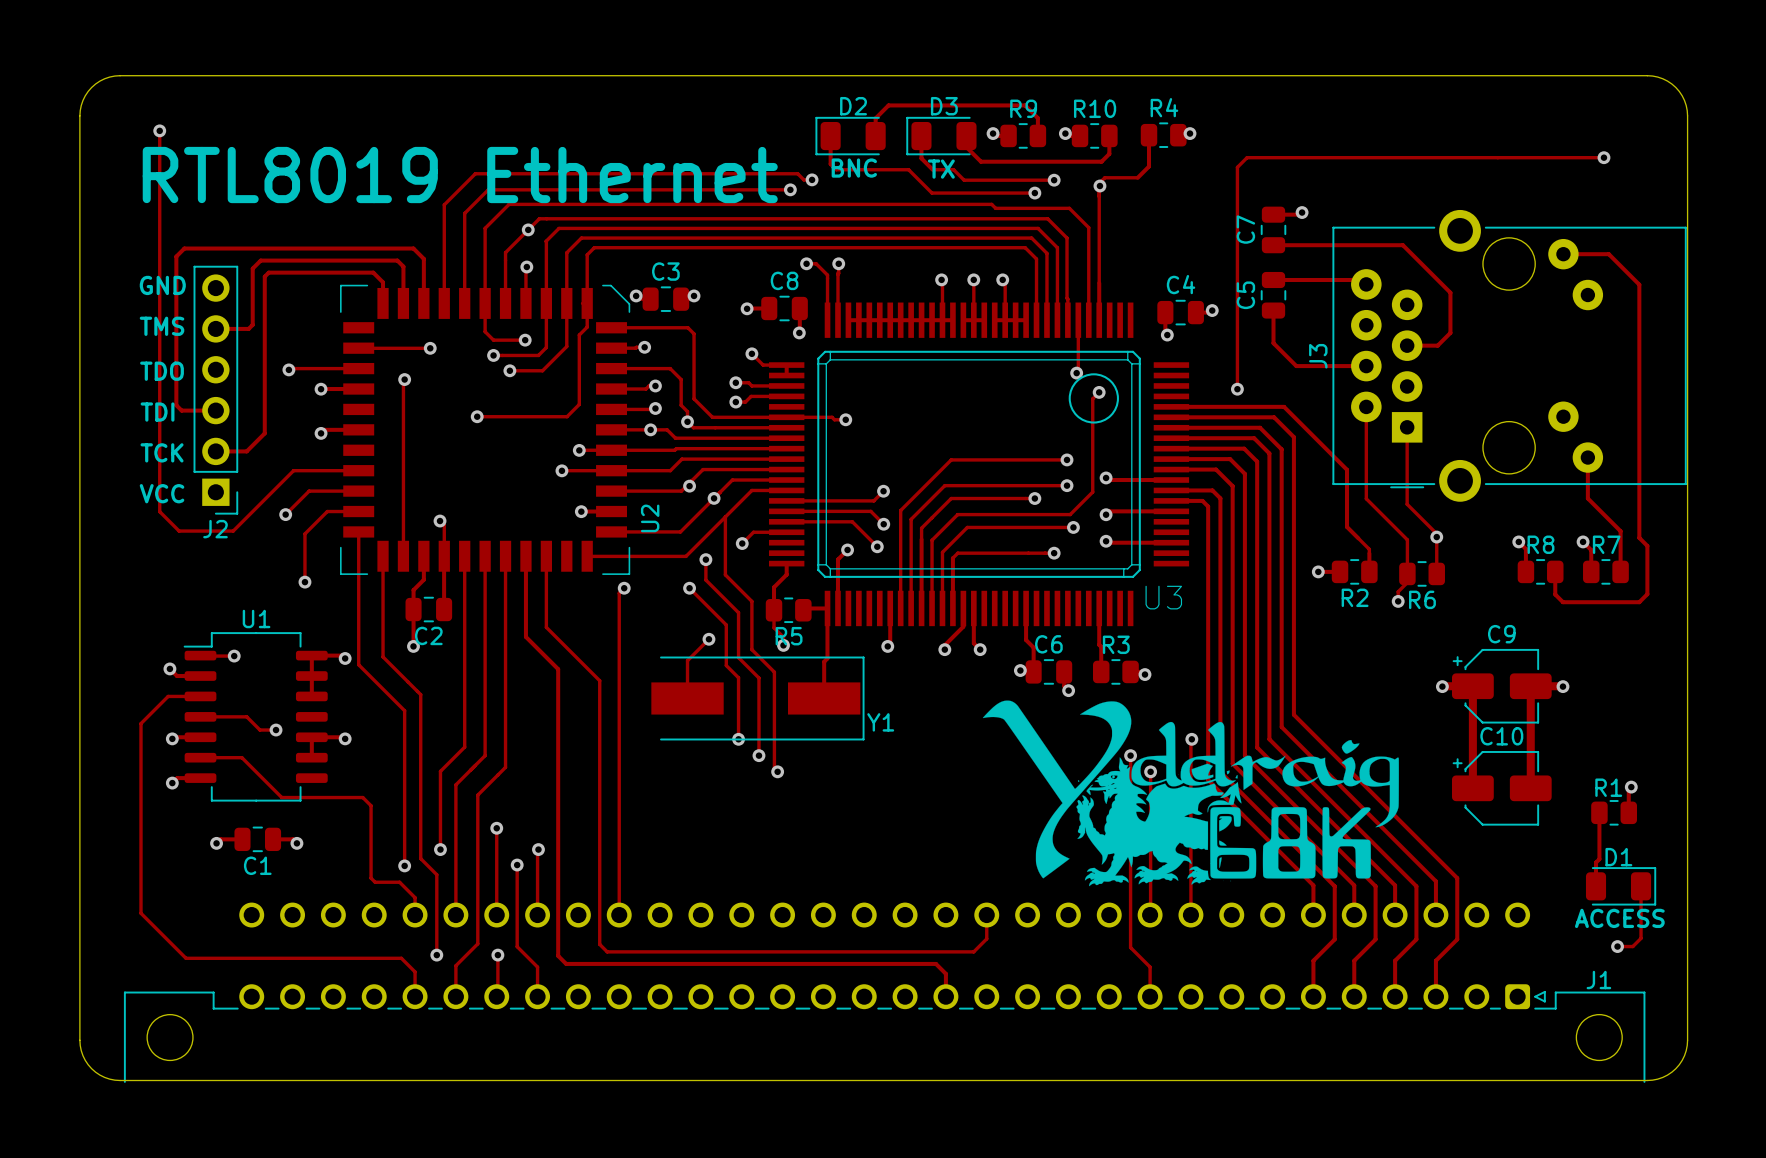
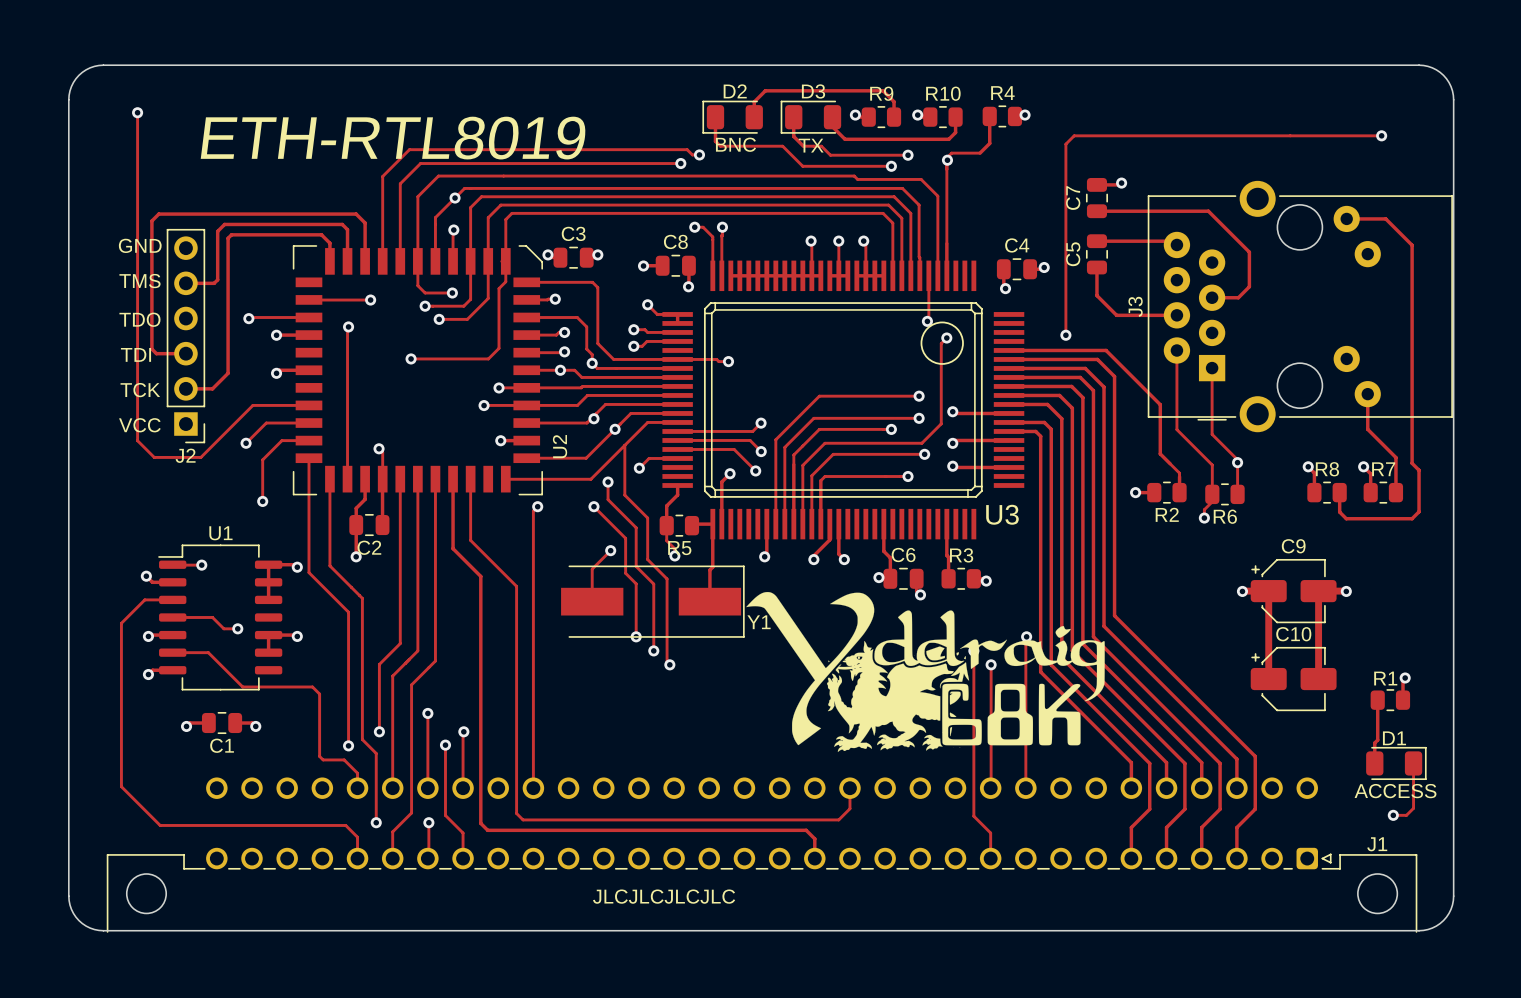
text: RTL8019 Ethernet (460, 175) -> ETH-RTL8019 (393, 138)
drawing position: (1190, 793) -> (925, 671)
text: none -> JLCJLCJLCJLC (664, 896)

